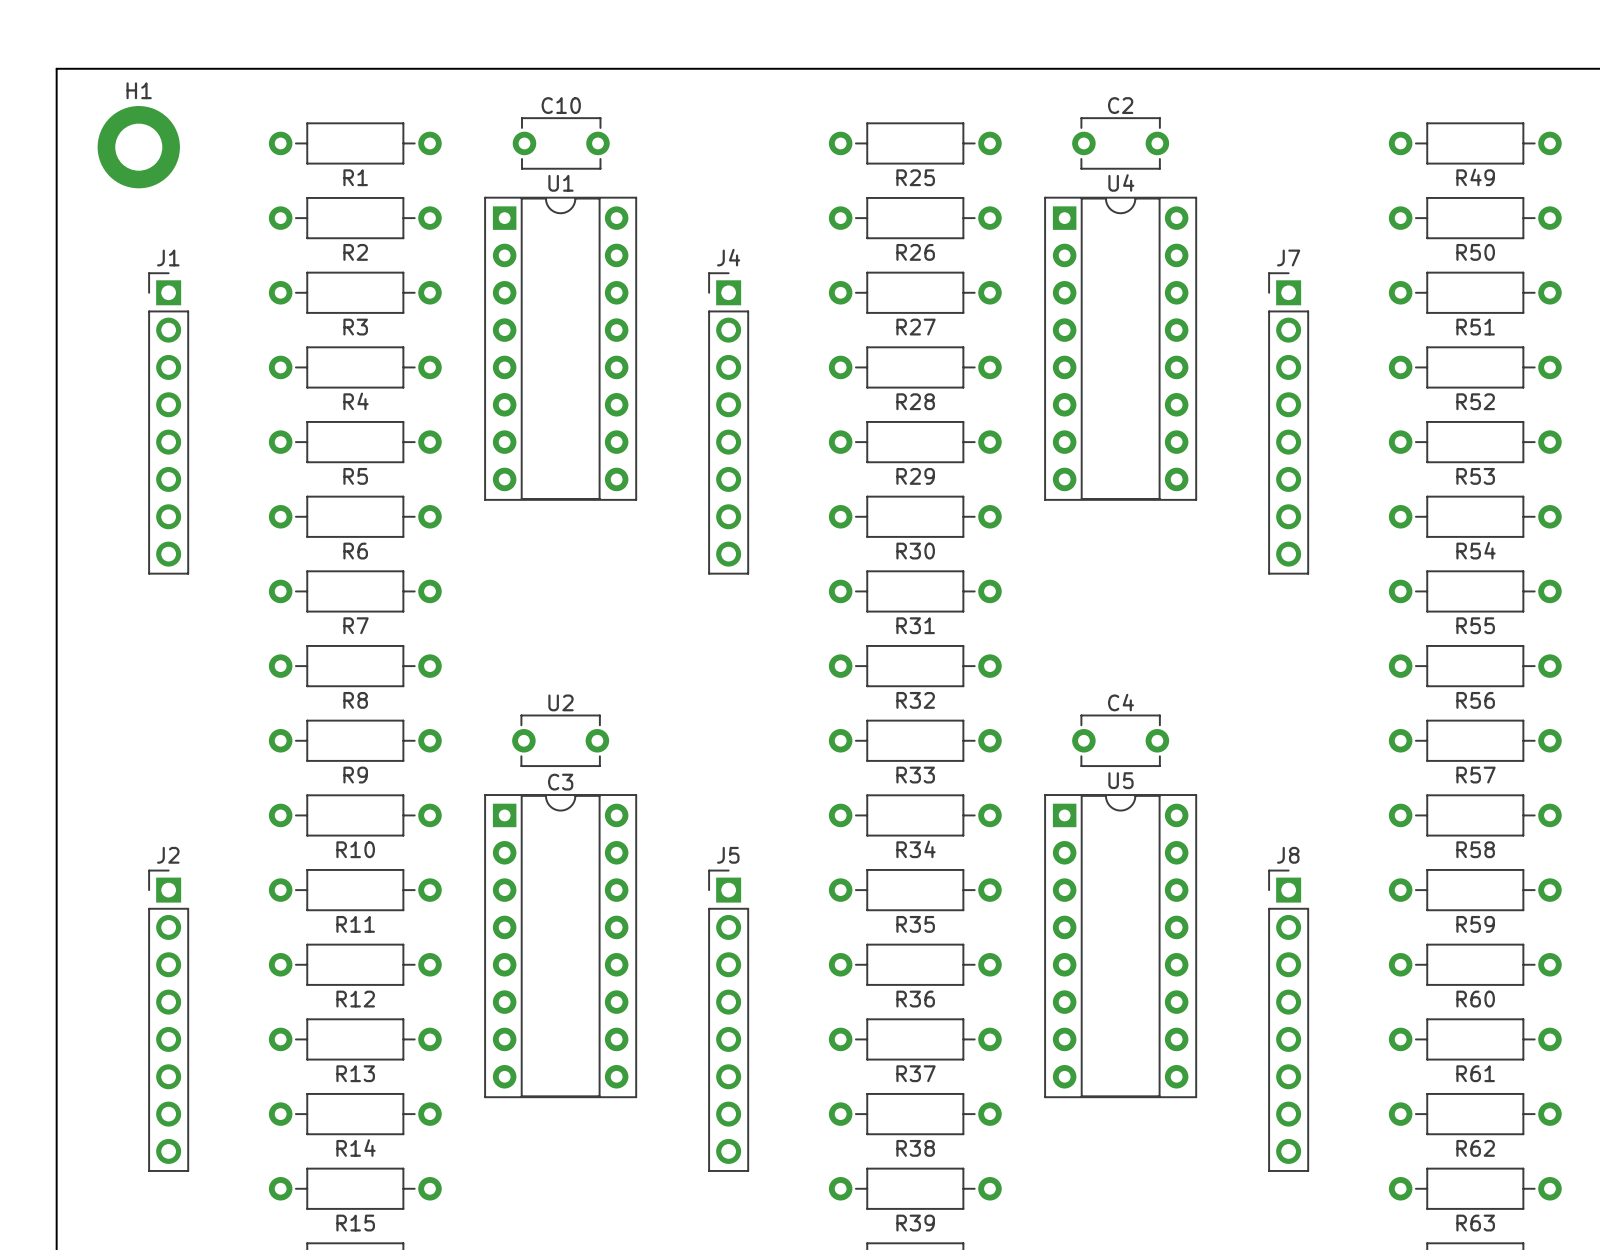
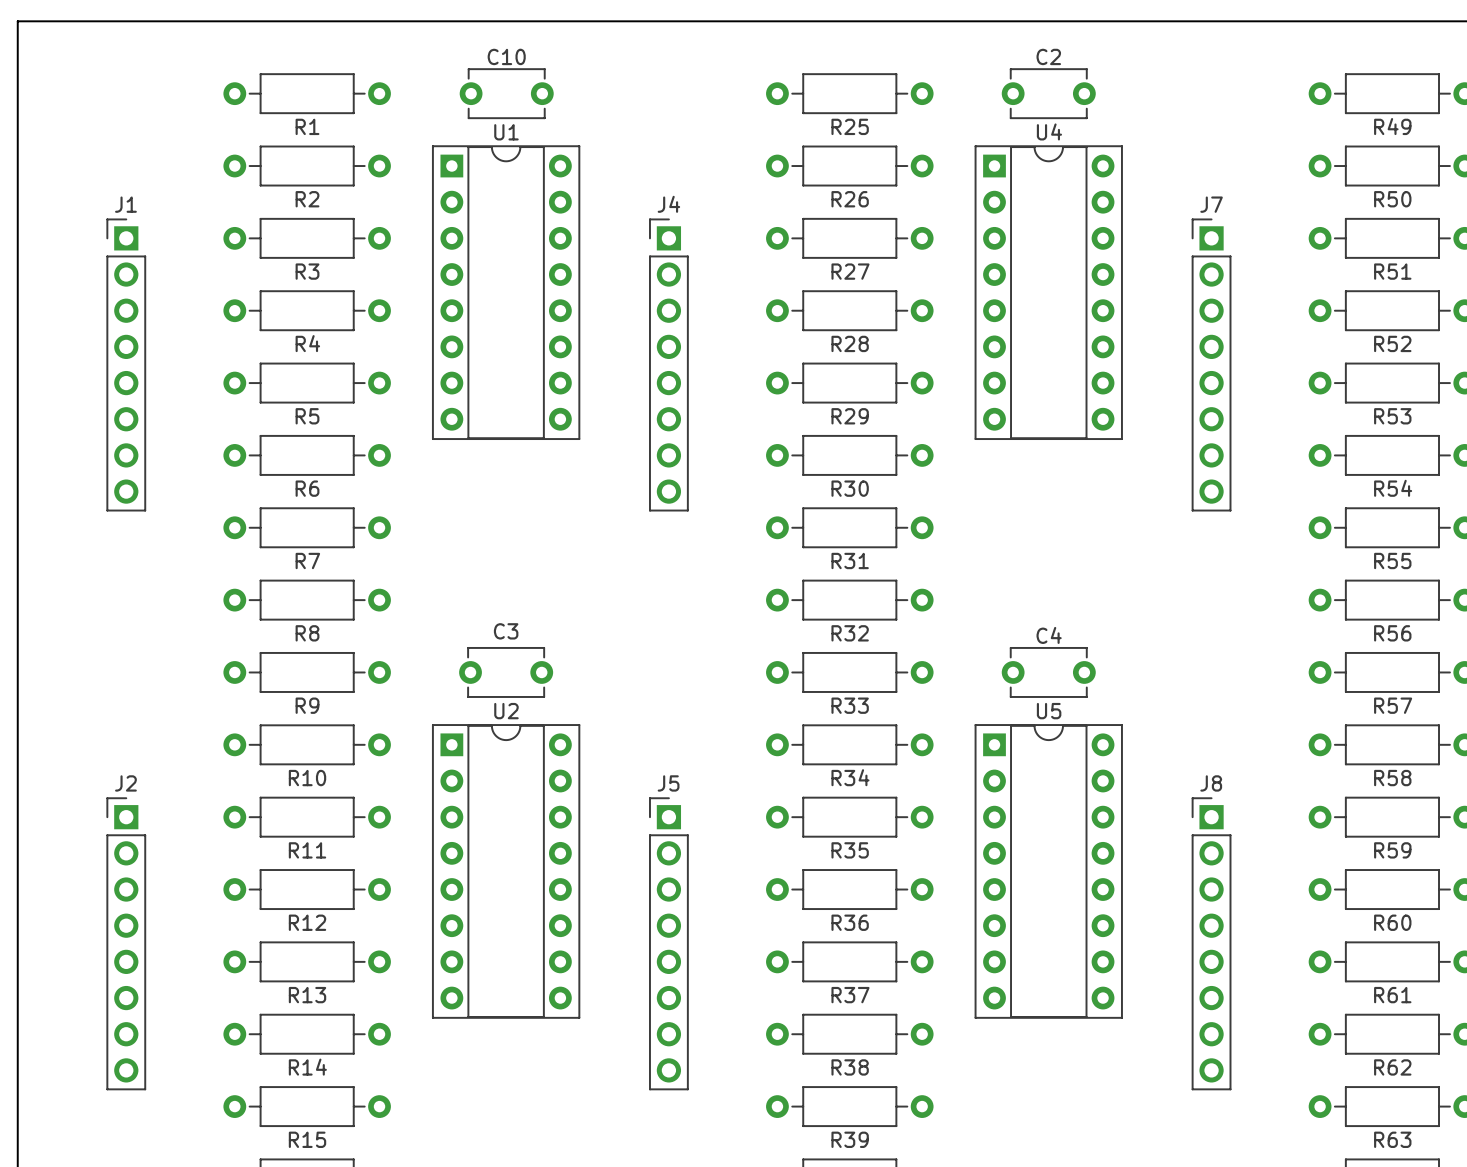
H1: (138, 147) -> none
U2 name position: U2 (560, 702) -> U2 (506, 711)
C3 name position: C3 (560, 782) -> C3 (506, 631)

